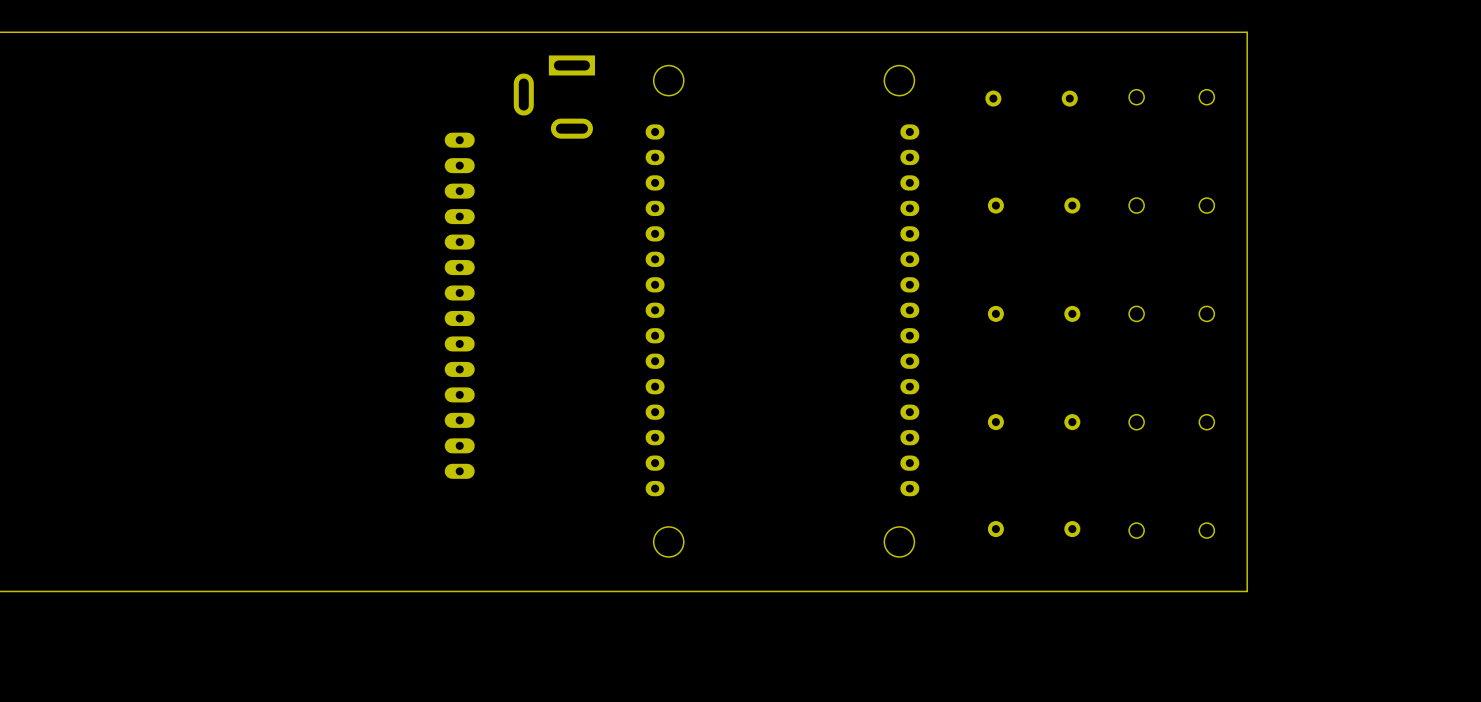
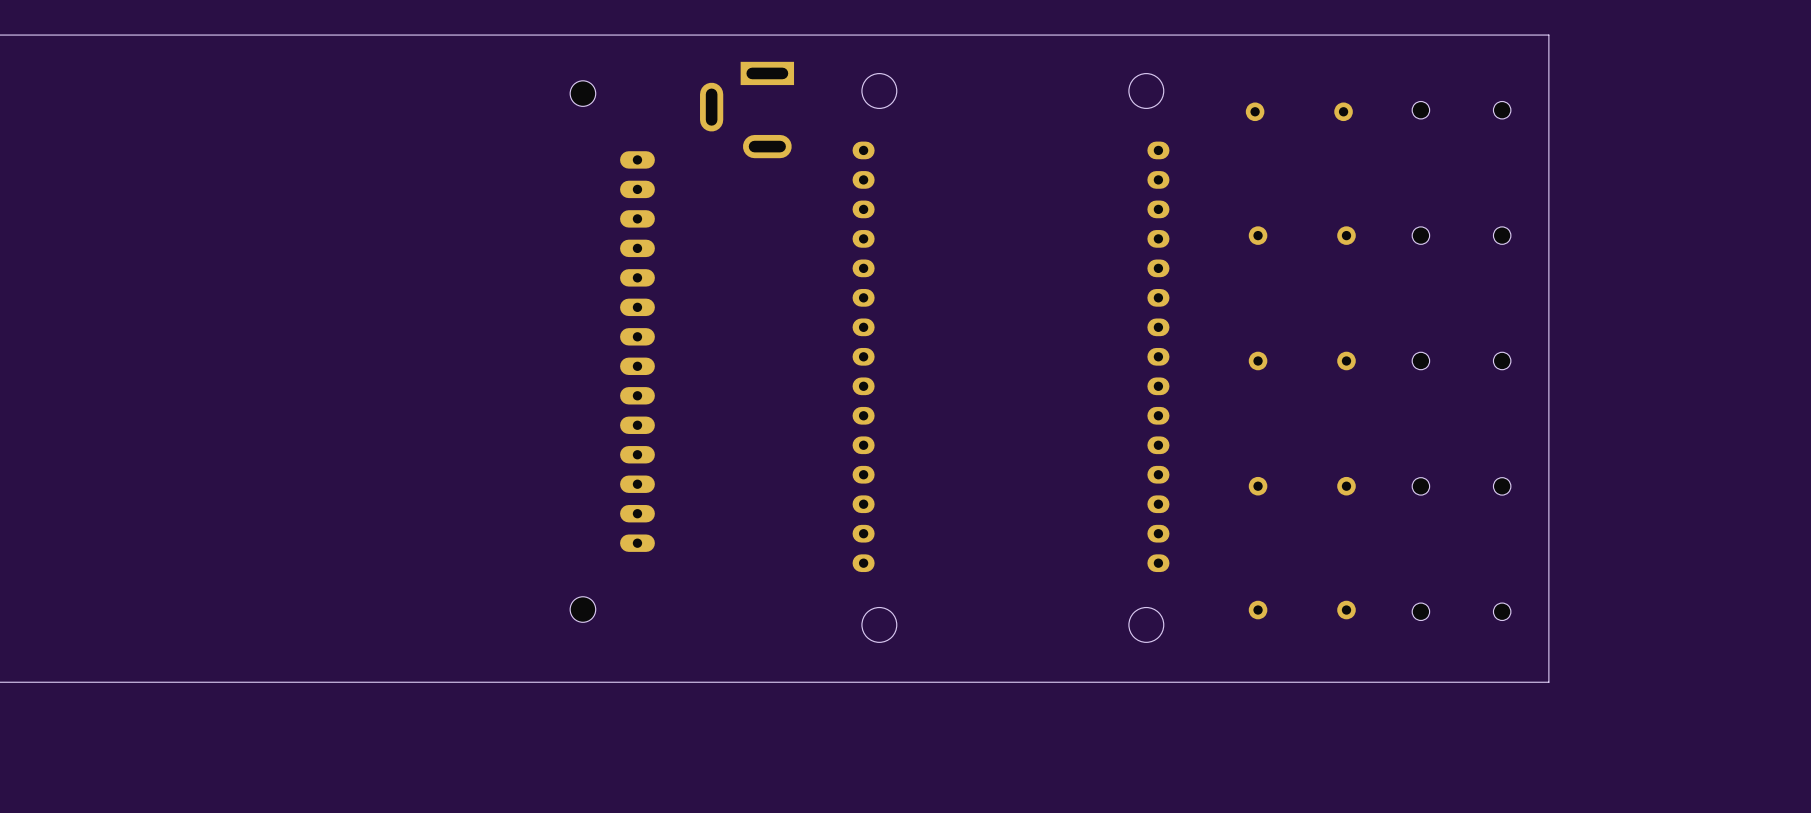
part: none -> (582, 93)
part: none -> (582, 609)

